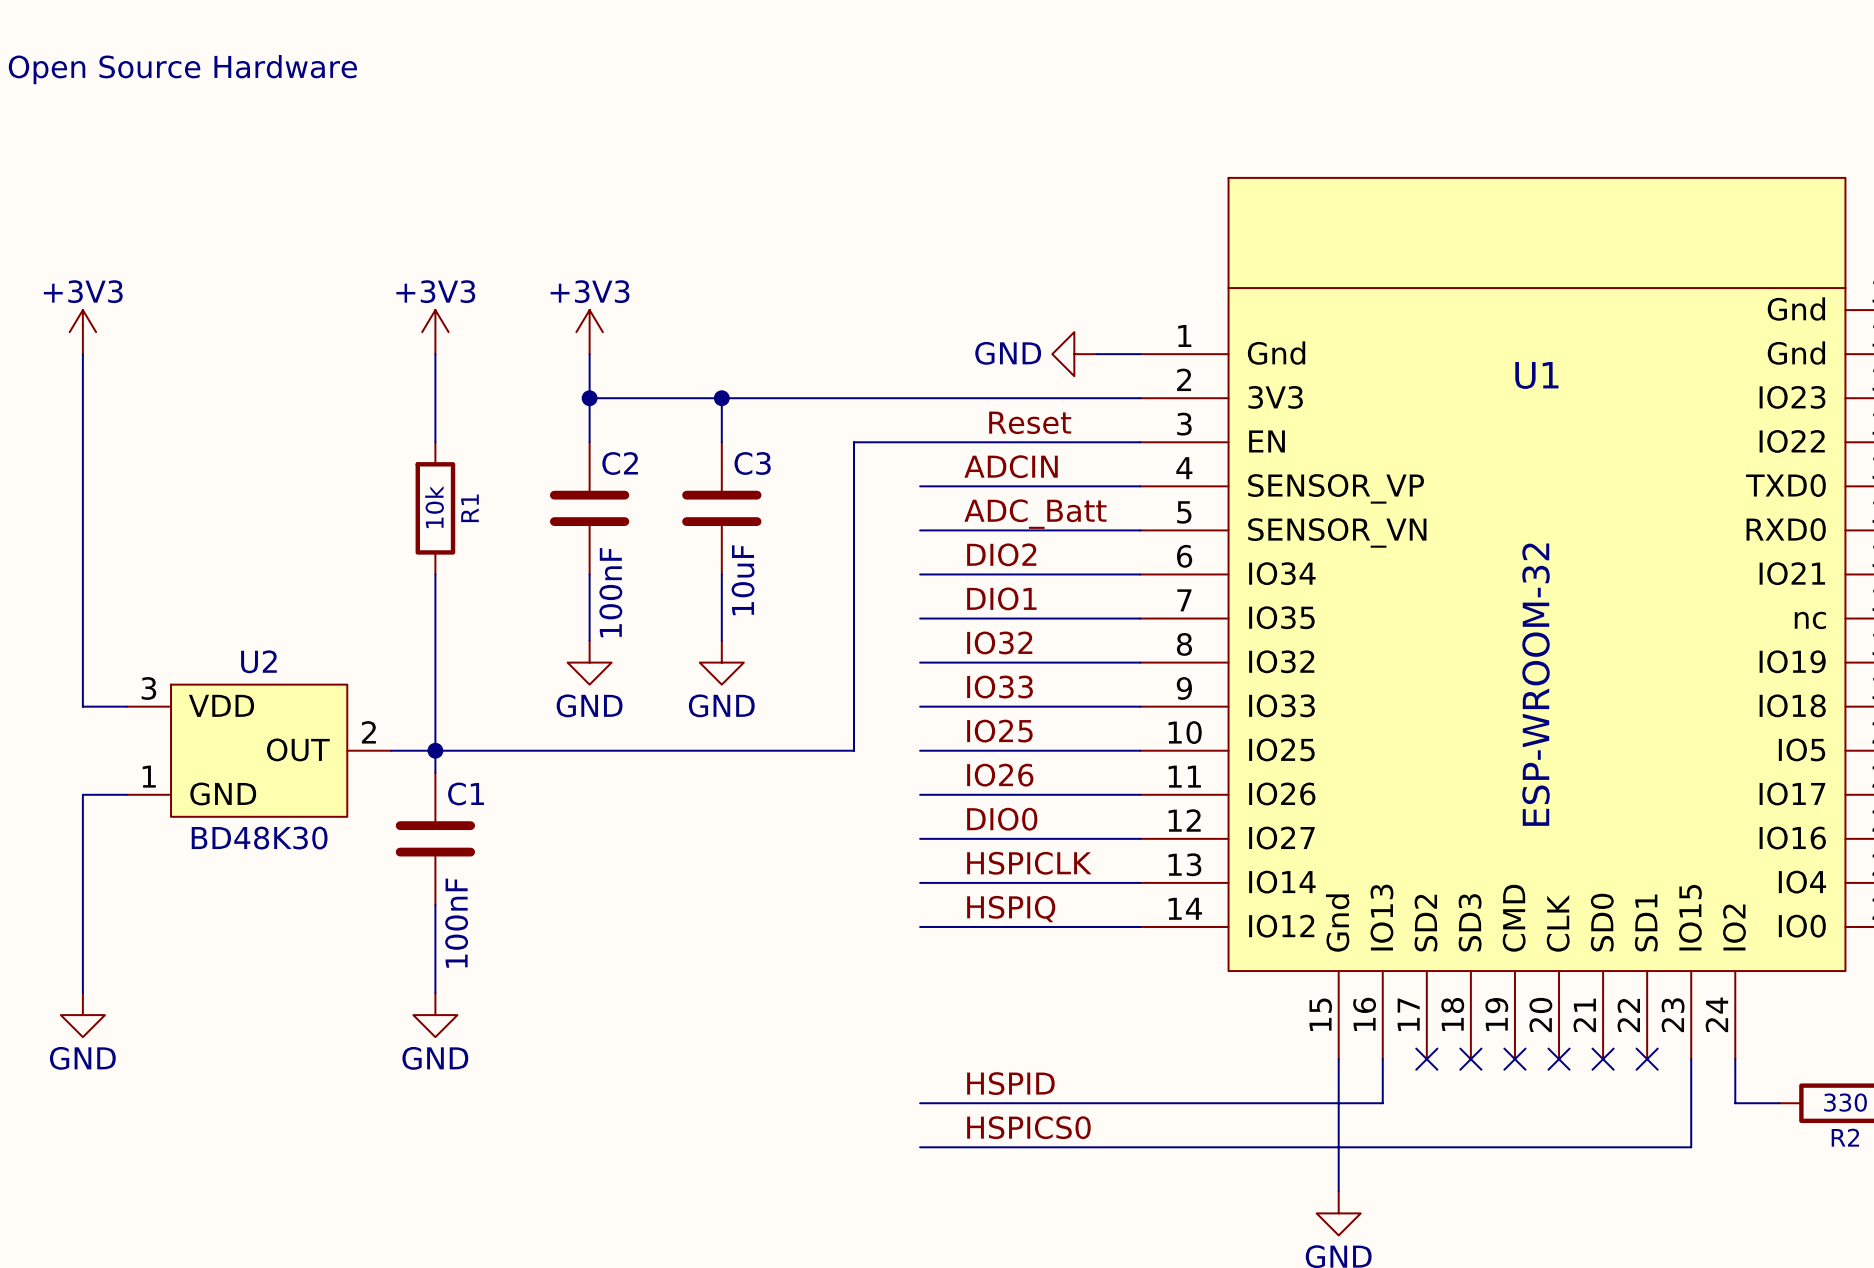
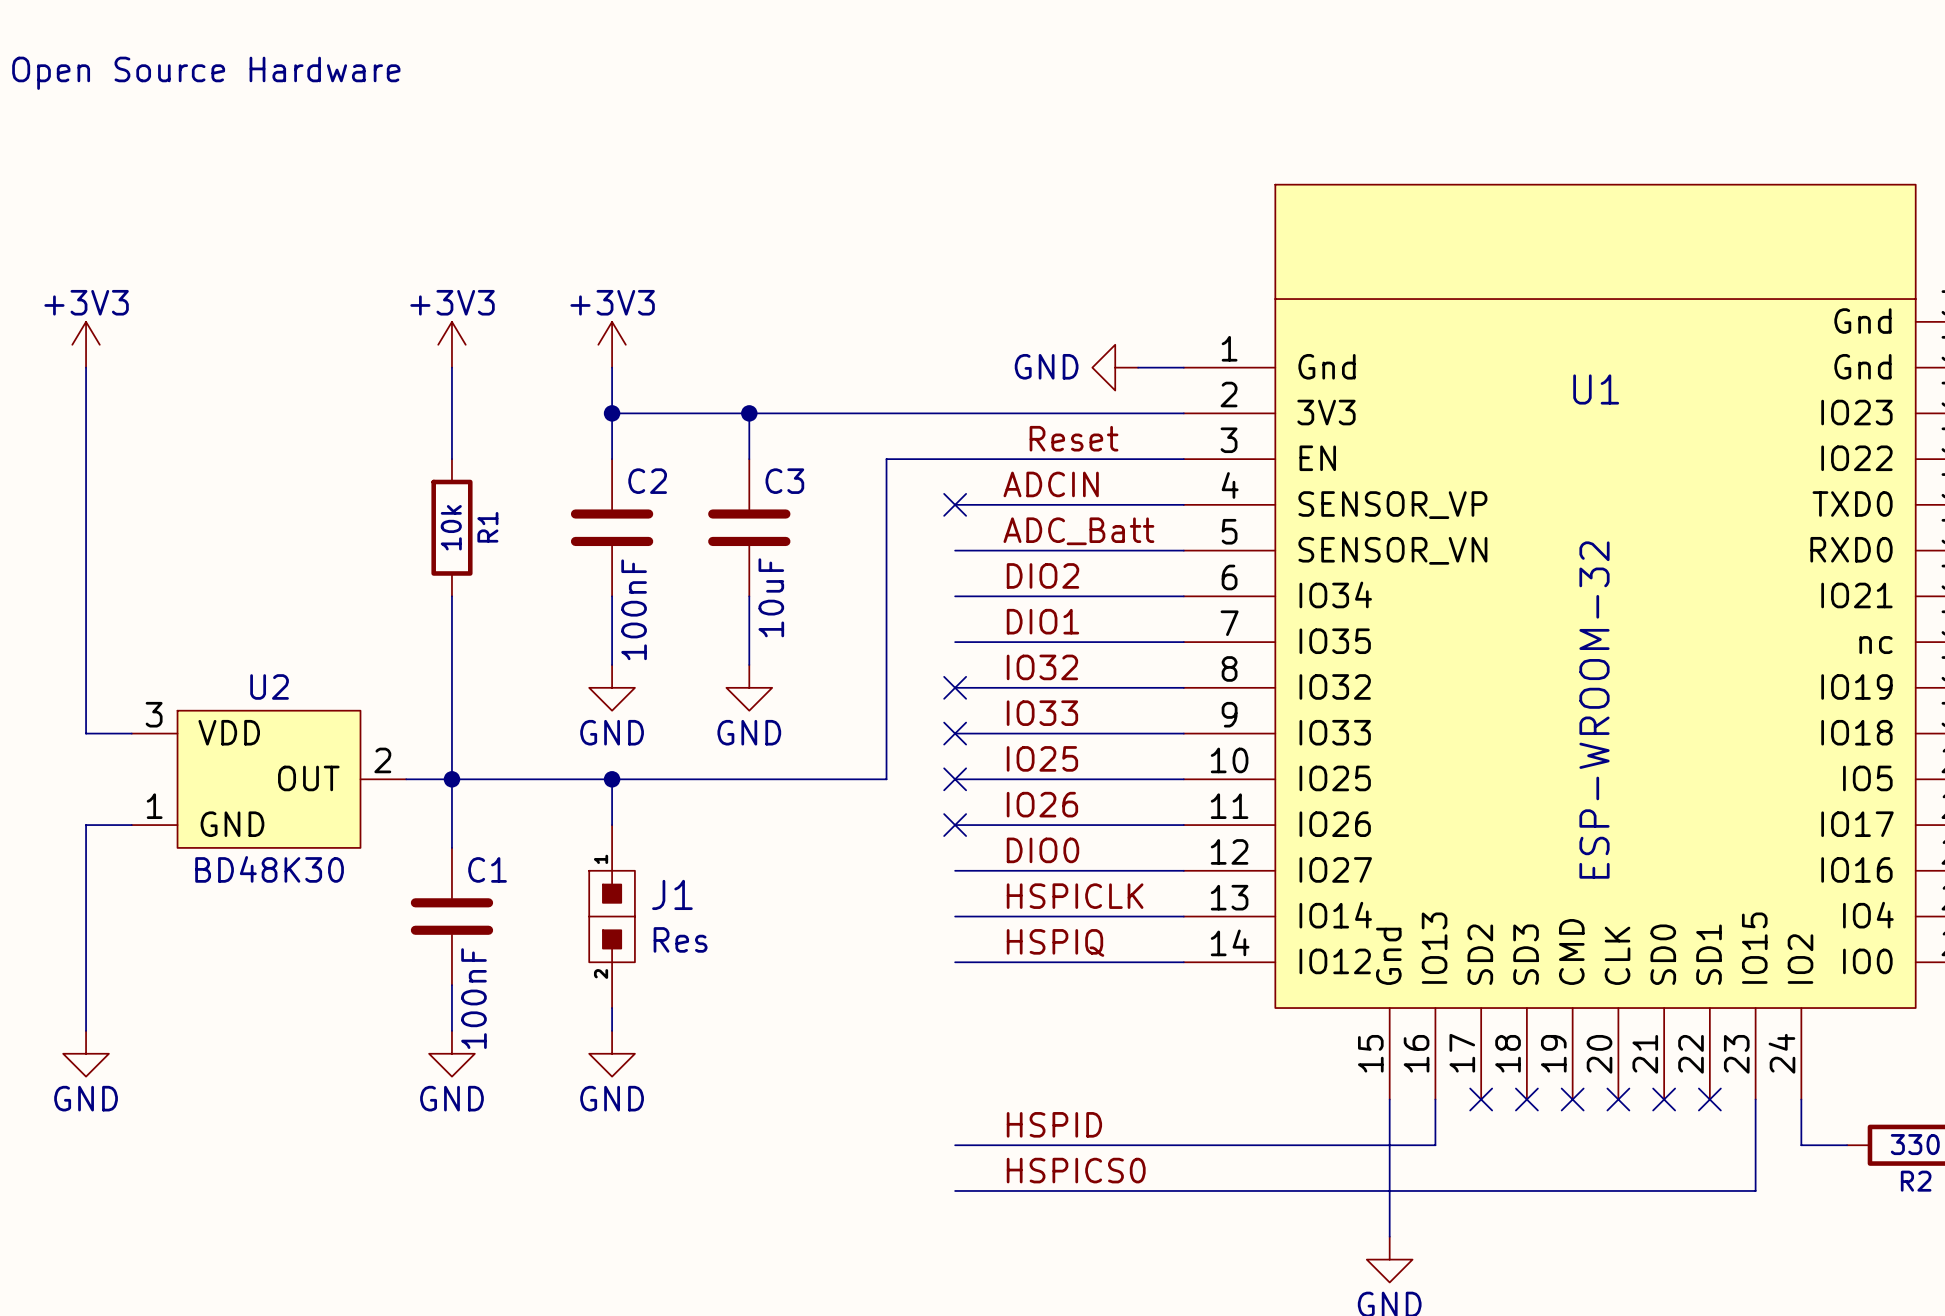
no-connect mark: none -> (955, 504)
no-connect mark: none -> (955, 687)
no-connect mark: none -> (955, 733)
wire: none -> (612, 779) (612, 825)
junction: none -> (612, 779)
no-connect mark: none -> (955, 779)
no-connect mark: none -> (955, 825)
C1 position: (435, 838) -> (451, 916)
J1: none -> Res (612, 916)
wire: none -> (612, 1008) (612, 1030)
power symbol: none -> GND (612, 1053)

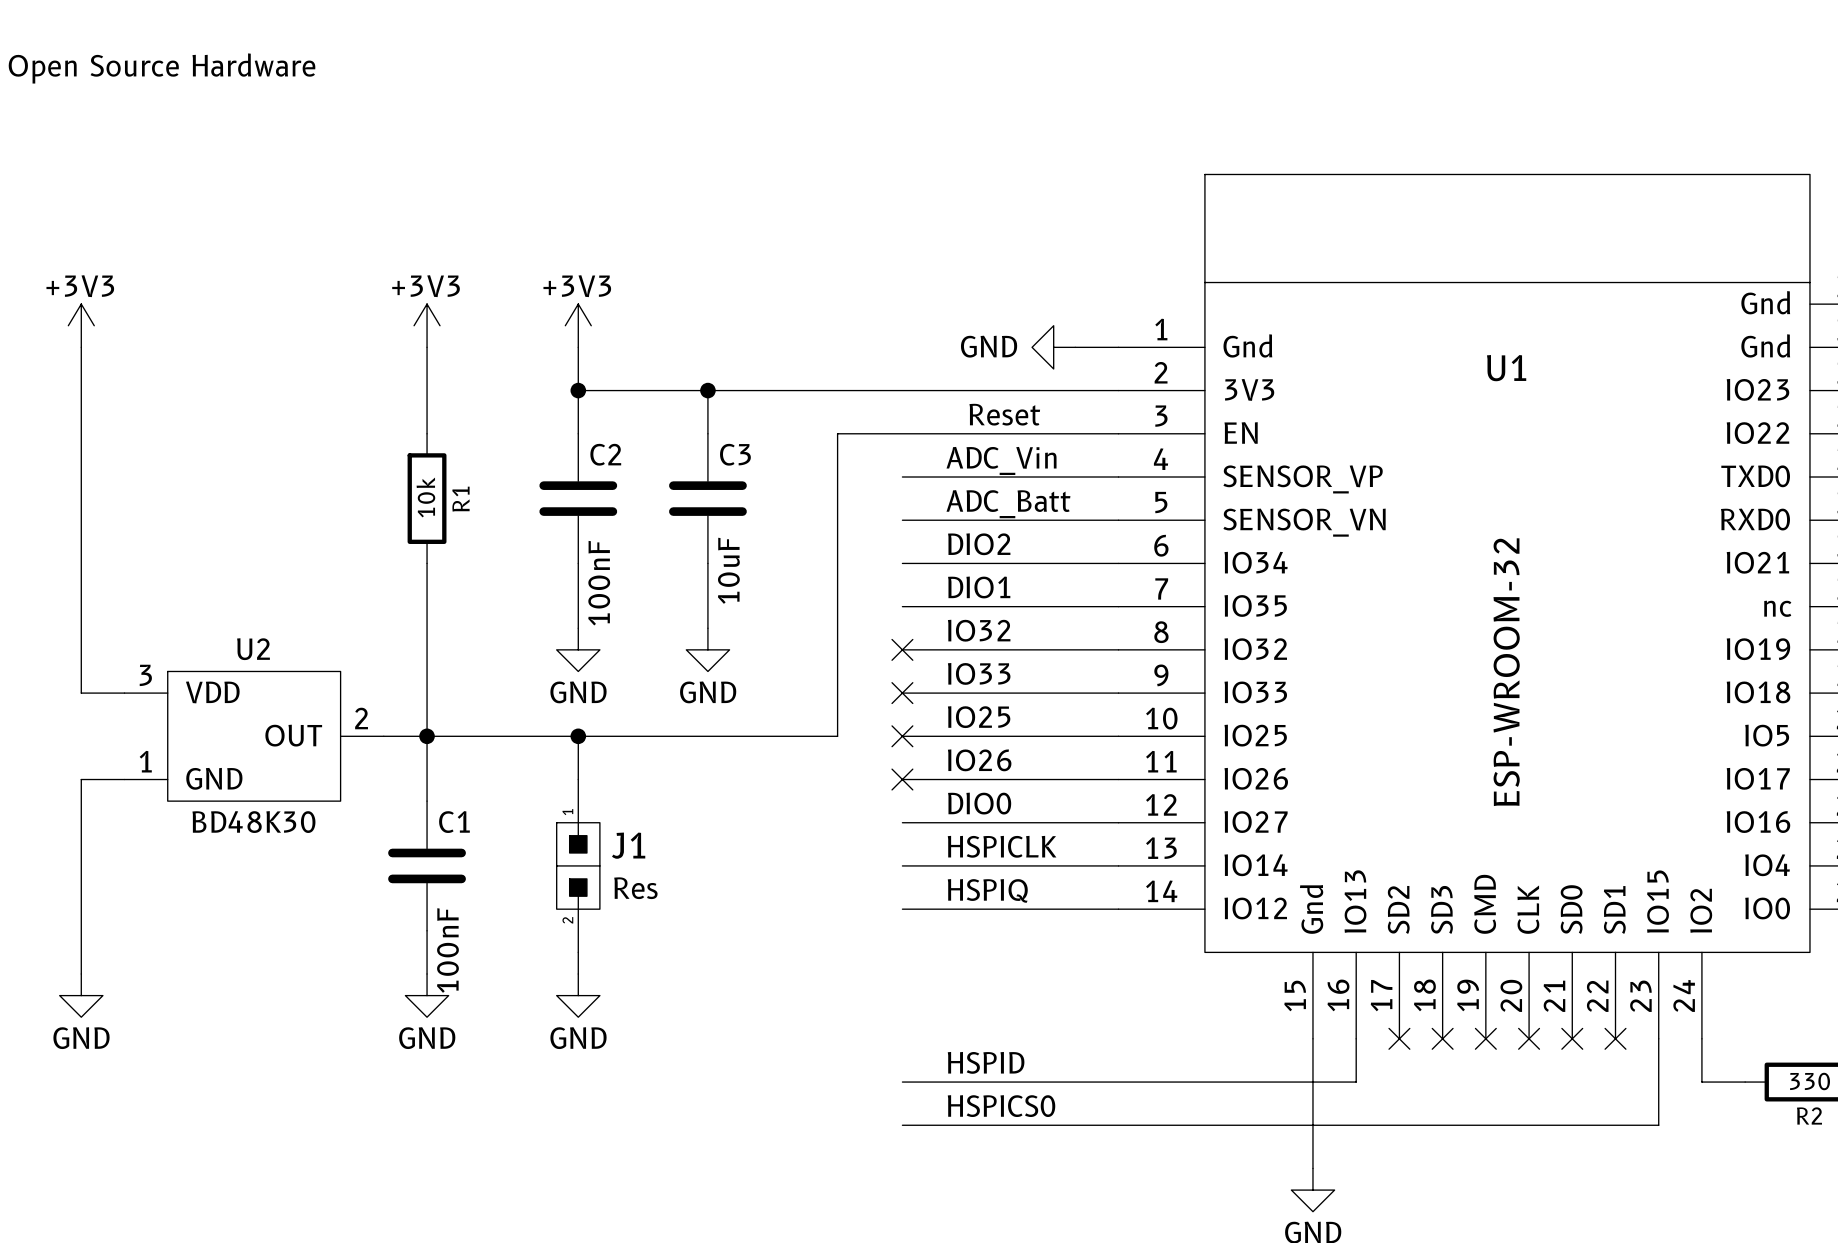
label: ADCIN (1051, 484) -> ADC_Vin (1001, 460)
no-connect mark: (955, 504) -> none

